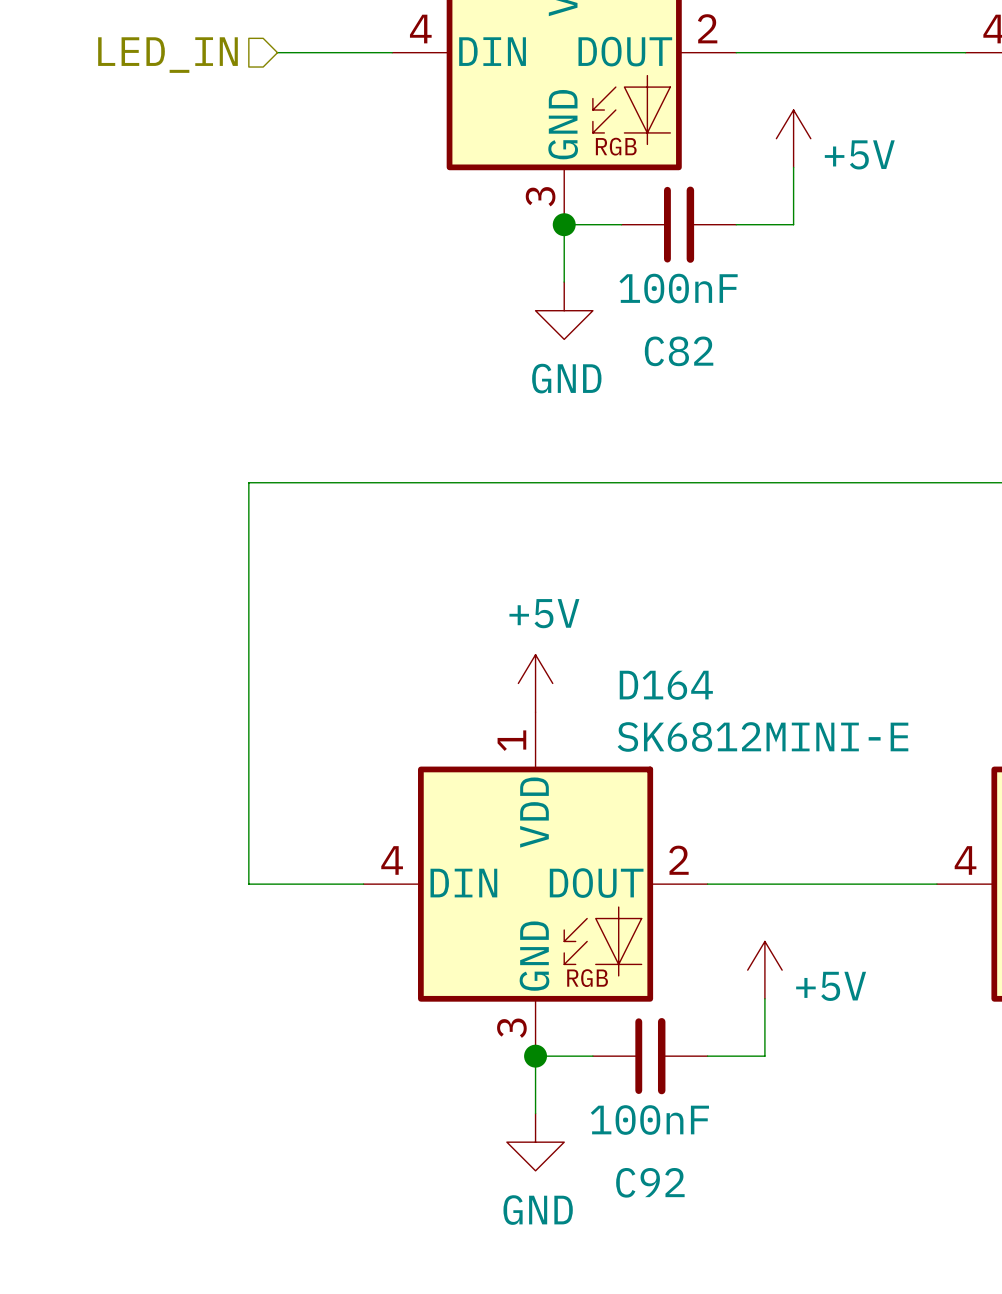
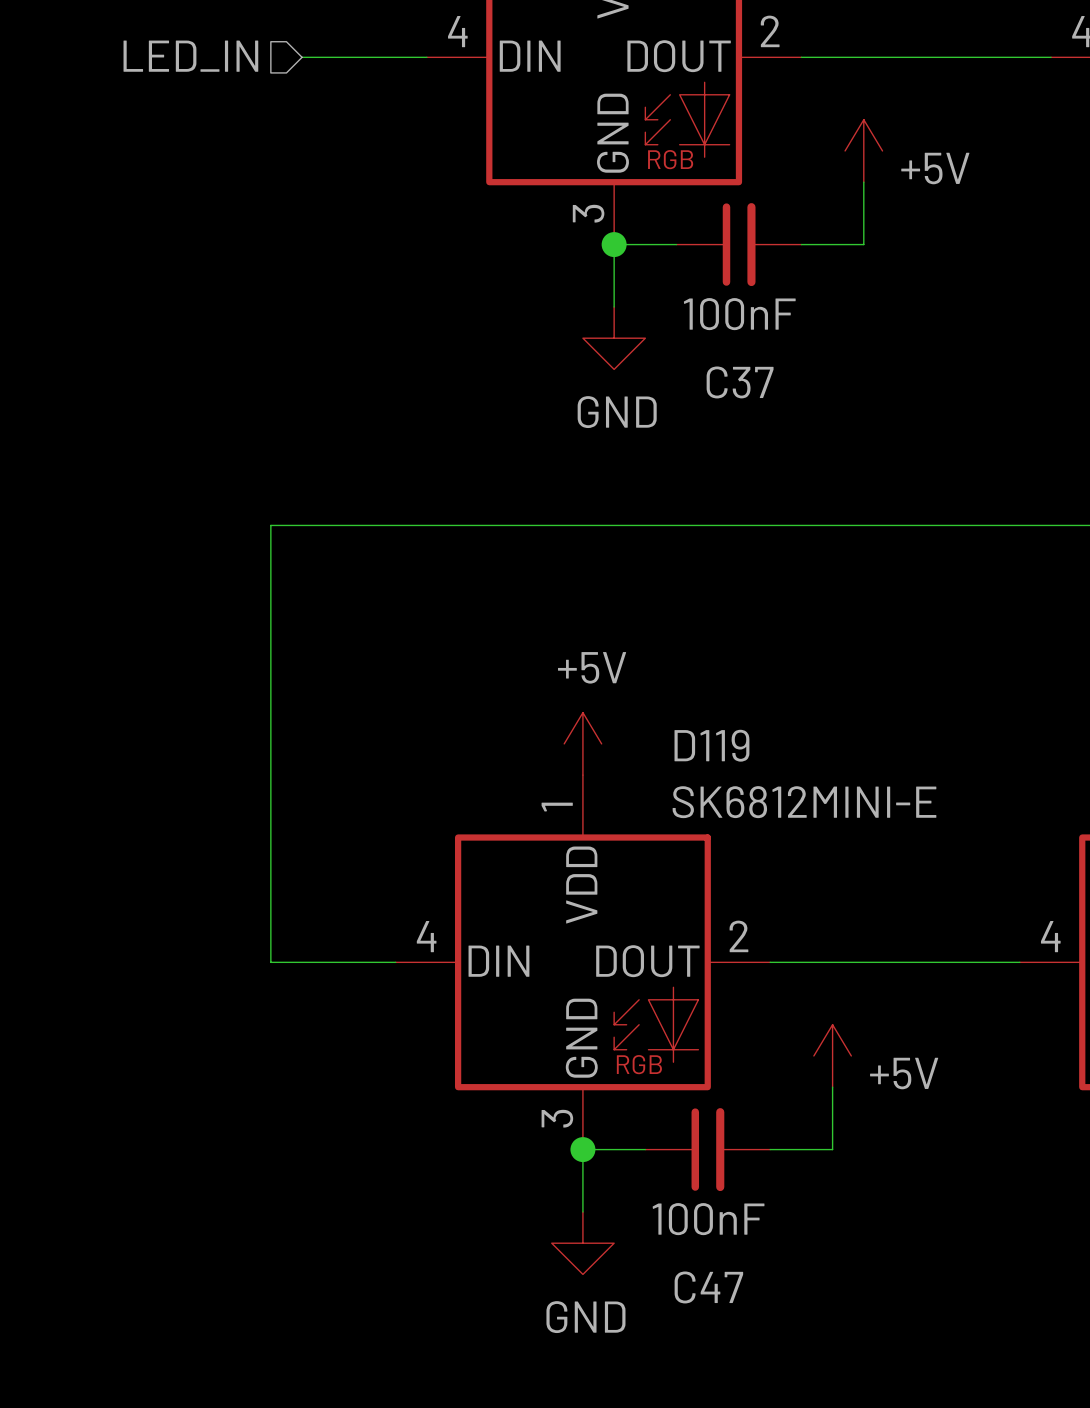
C82 name: C82 (679, 351) -> C37 (740, 382)
D164 name: D164 (666, 685) -> D119 (711, 745)
C92 name: C92 (650, 1182) -> C47 (708, 1287)

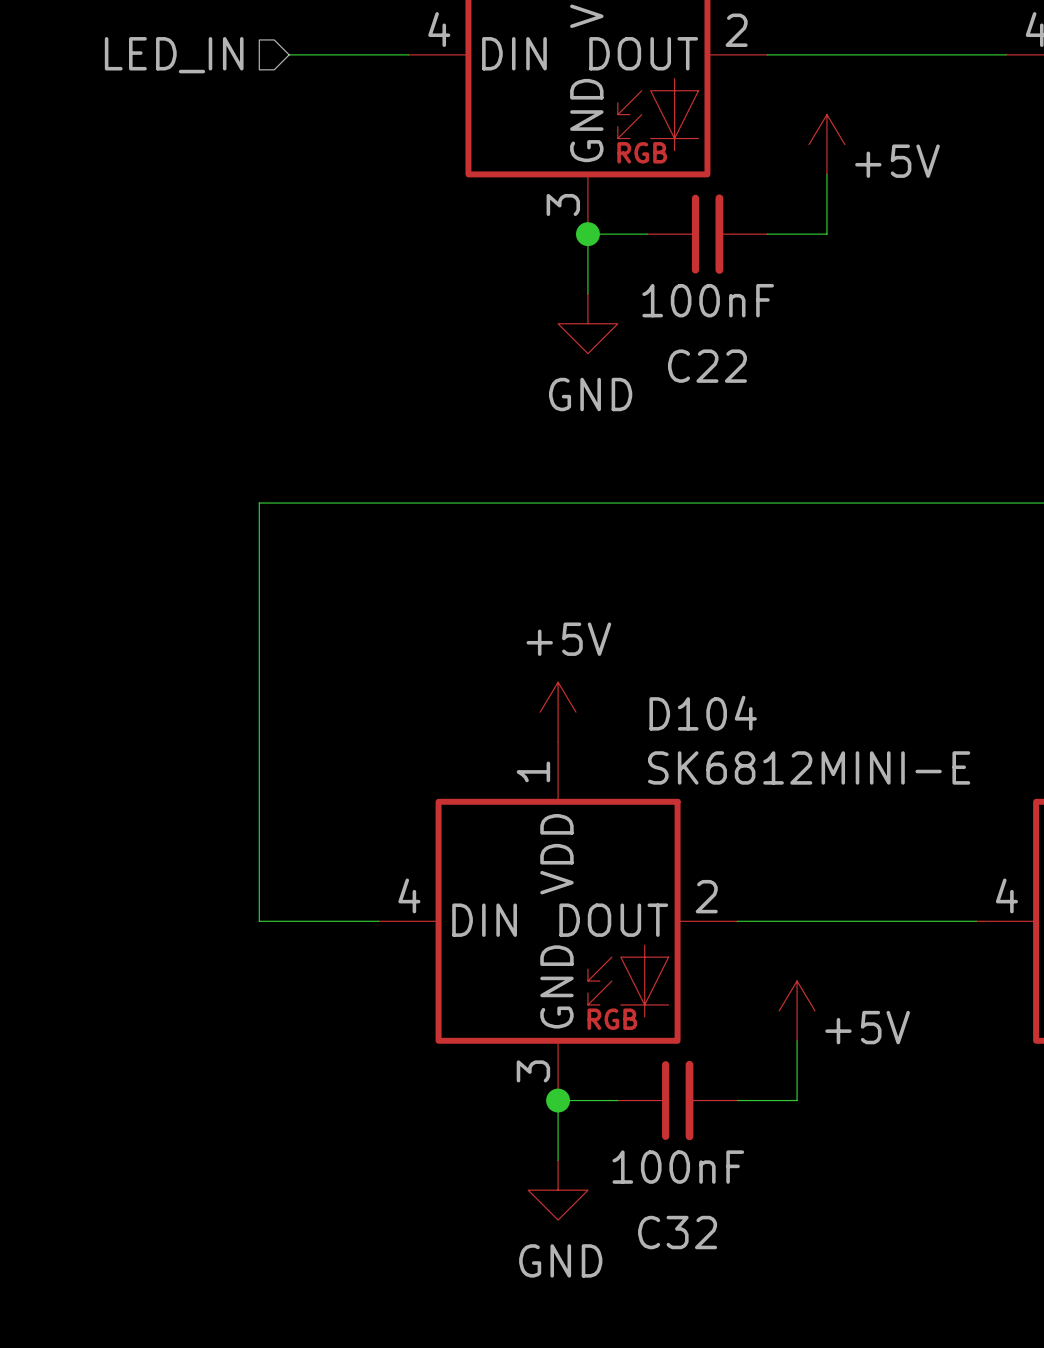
C37 name: C37 (740, 382) -> C22 (707, 366)
D119 name: D119 (711, 745) -> D104 (703, 713)
C47 name: C47 (708, 1287) -> C32 (677, 1232)

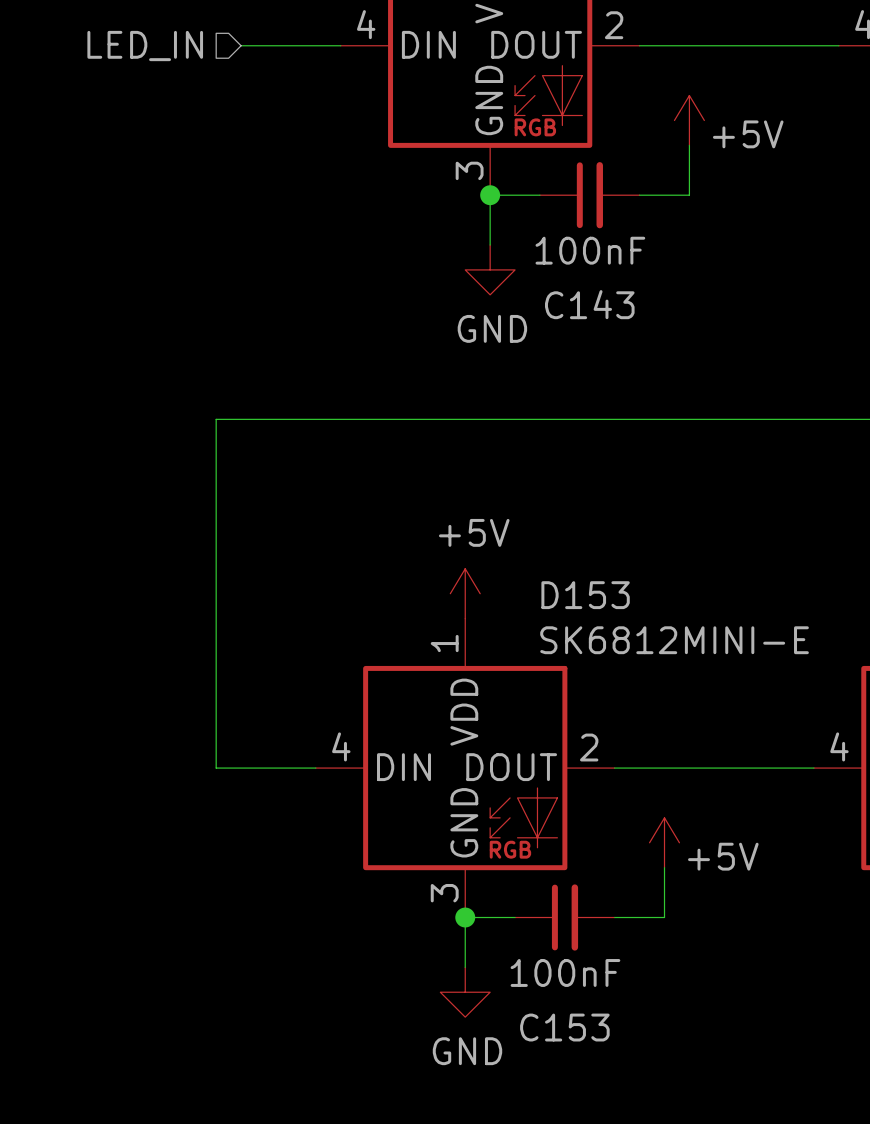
C22 name: C22 (707, 366) -> C143 (589, 304)
D104 name: D104 (703, 713) -> D153 (585, 595)
C32 name: C32 (677, 1232) -> C153 (564, 1027)

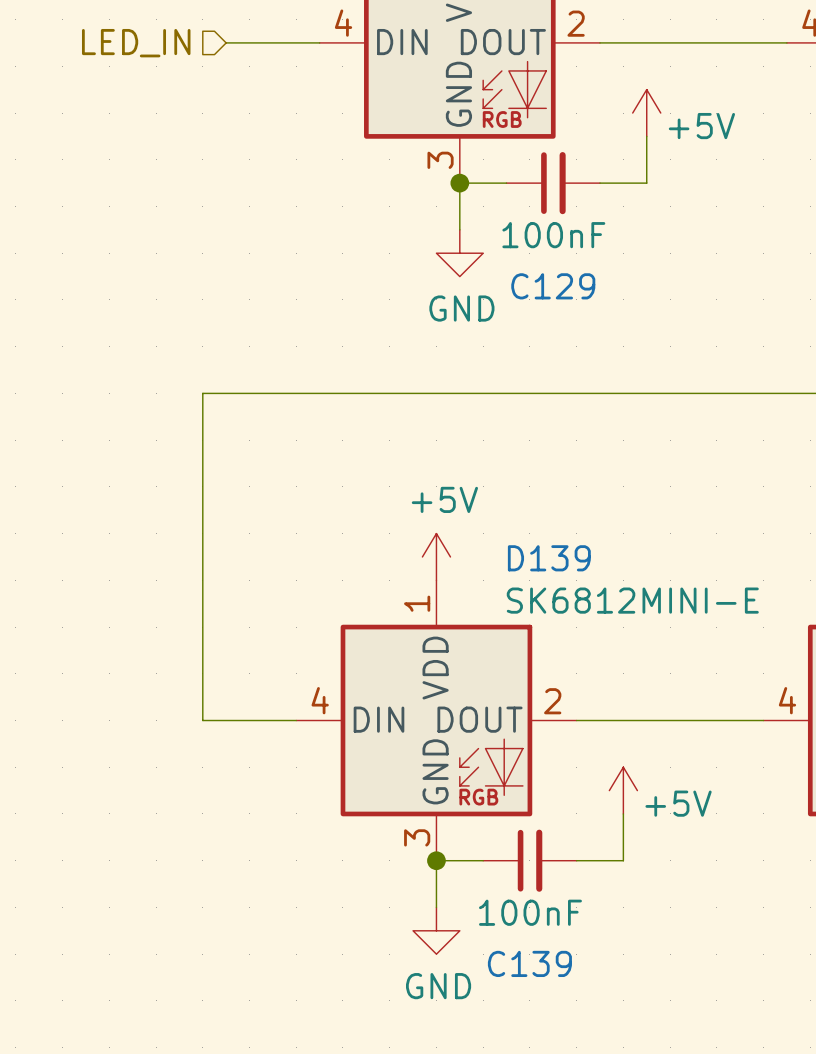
C143 name: C143 (589, 304) -> C129 (553, 286)
D153 name: D153 (585, 595) -> D139 (549, 558)
C153 name: C153 (564, 1027) -> C139 (529, 963)

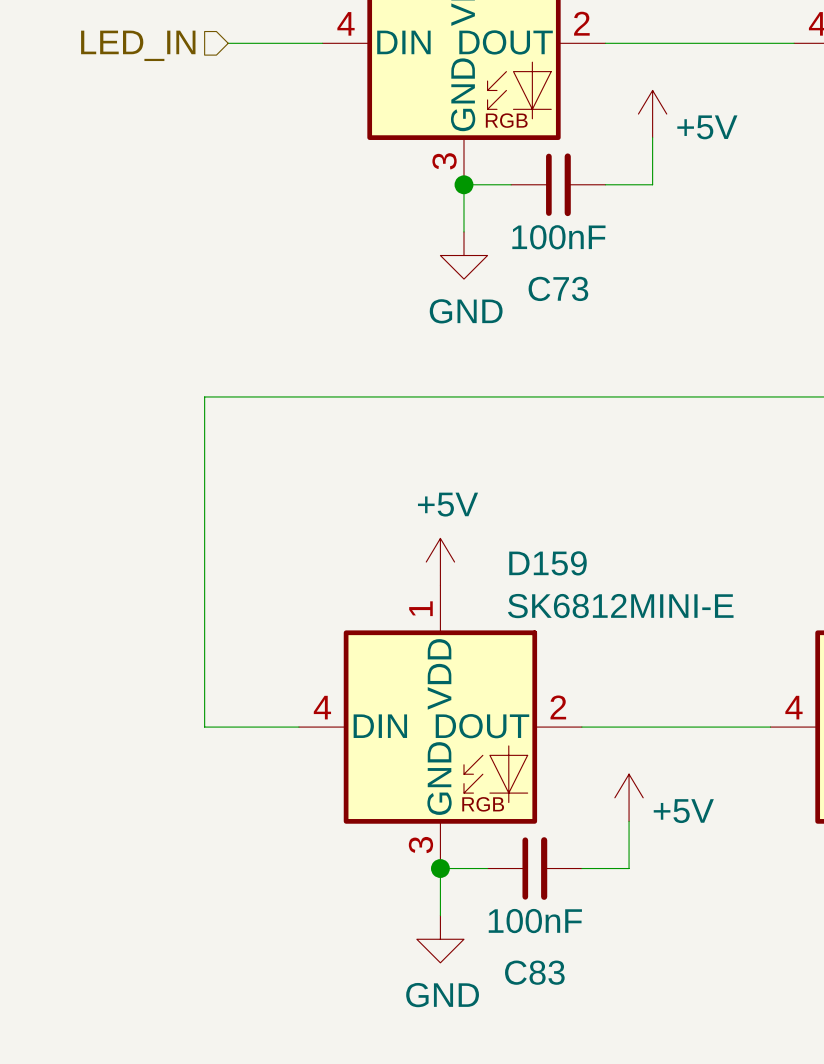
C129 name: C129 (553, 286) -> C73 (558, 288)
D139 name: D139 (549, 558) -> D159 (547, 563)
C139 name: C139 (529, 963) -> C83 (534, 972)

